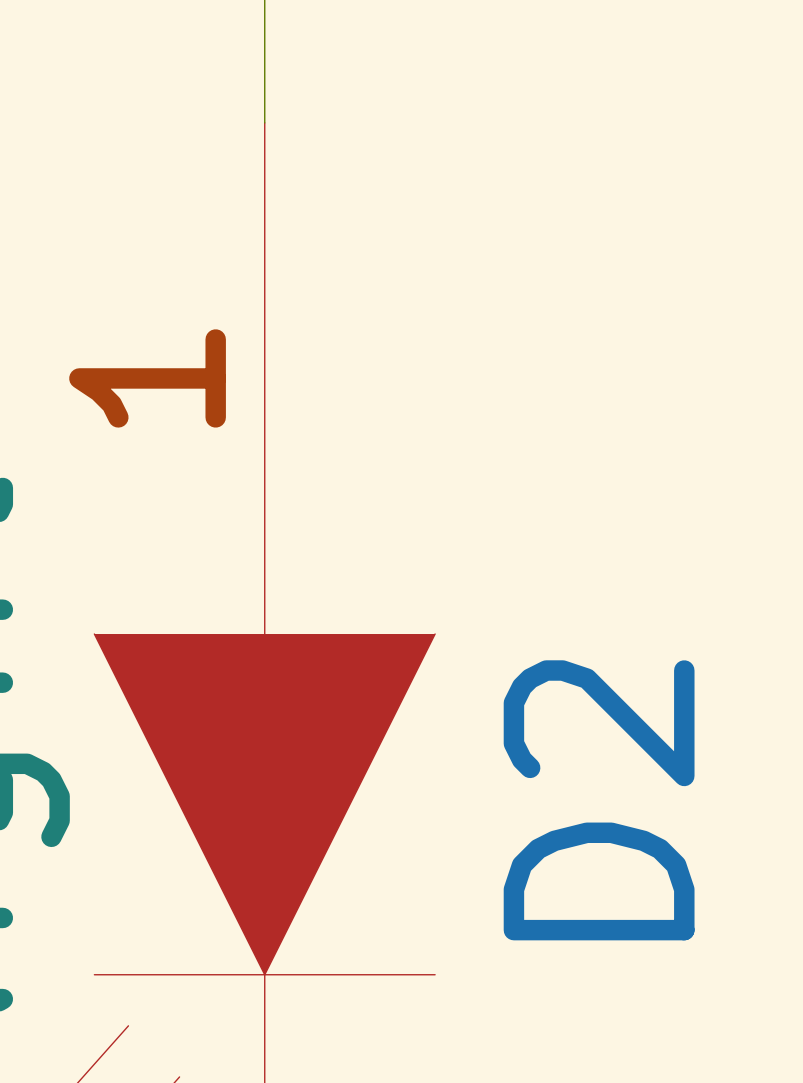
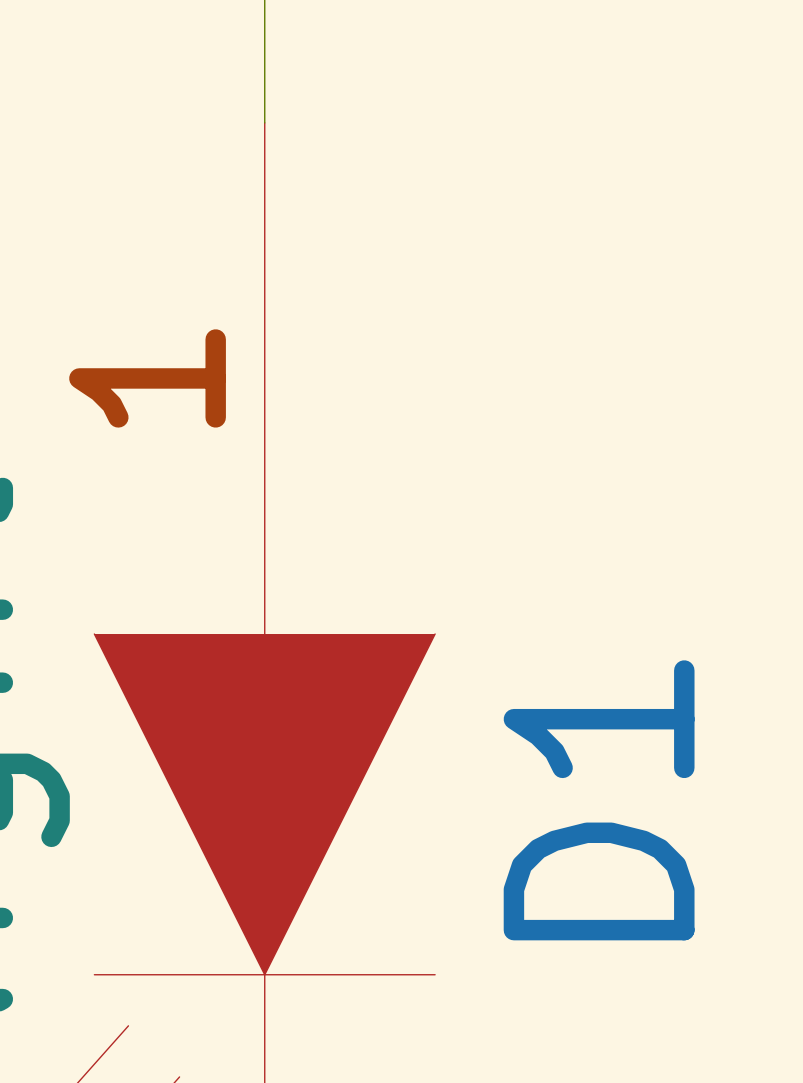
D2 name: D2 (599, 800) -> D1 (599, 800)

